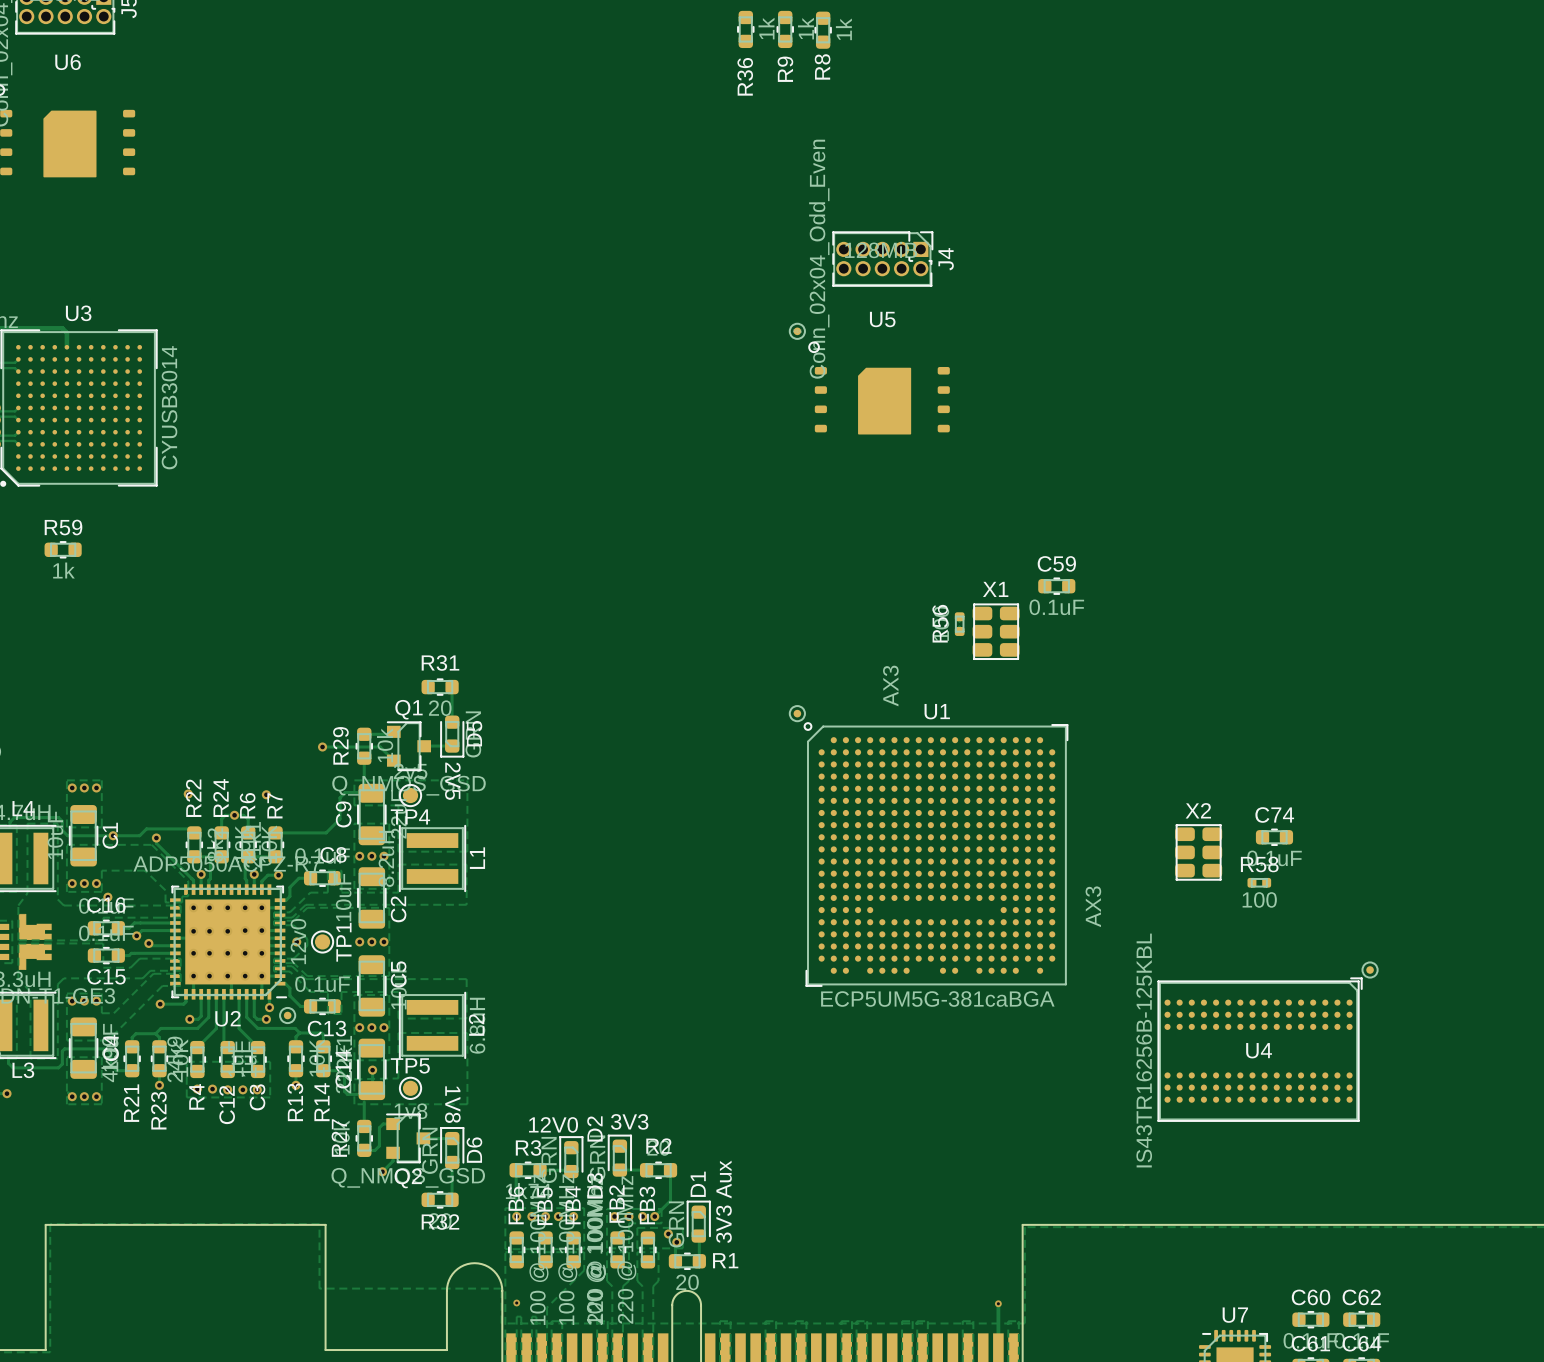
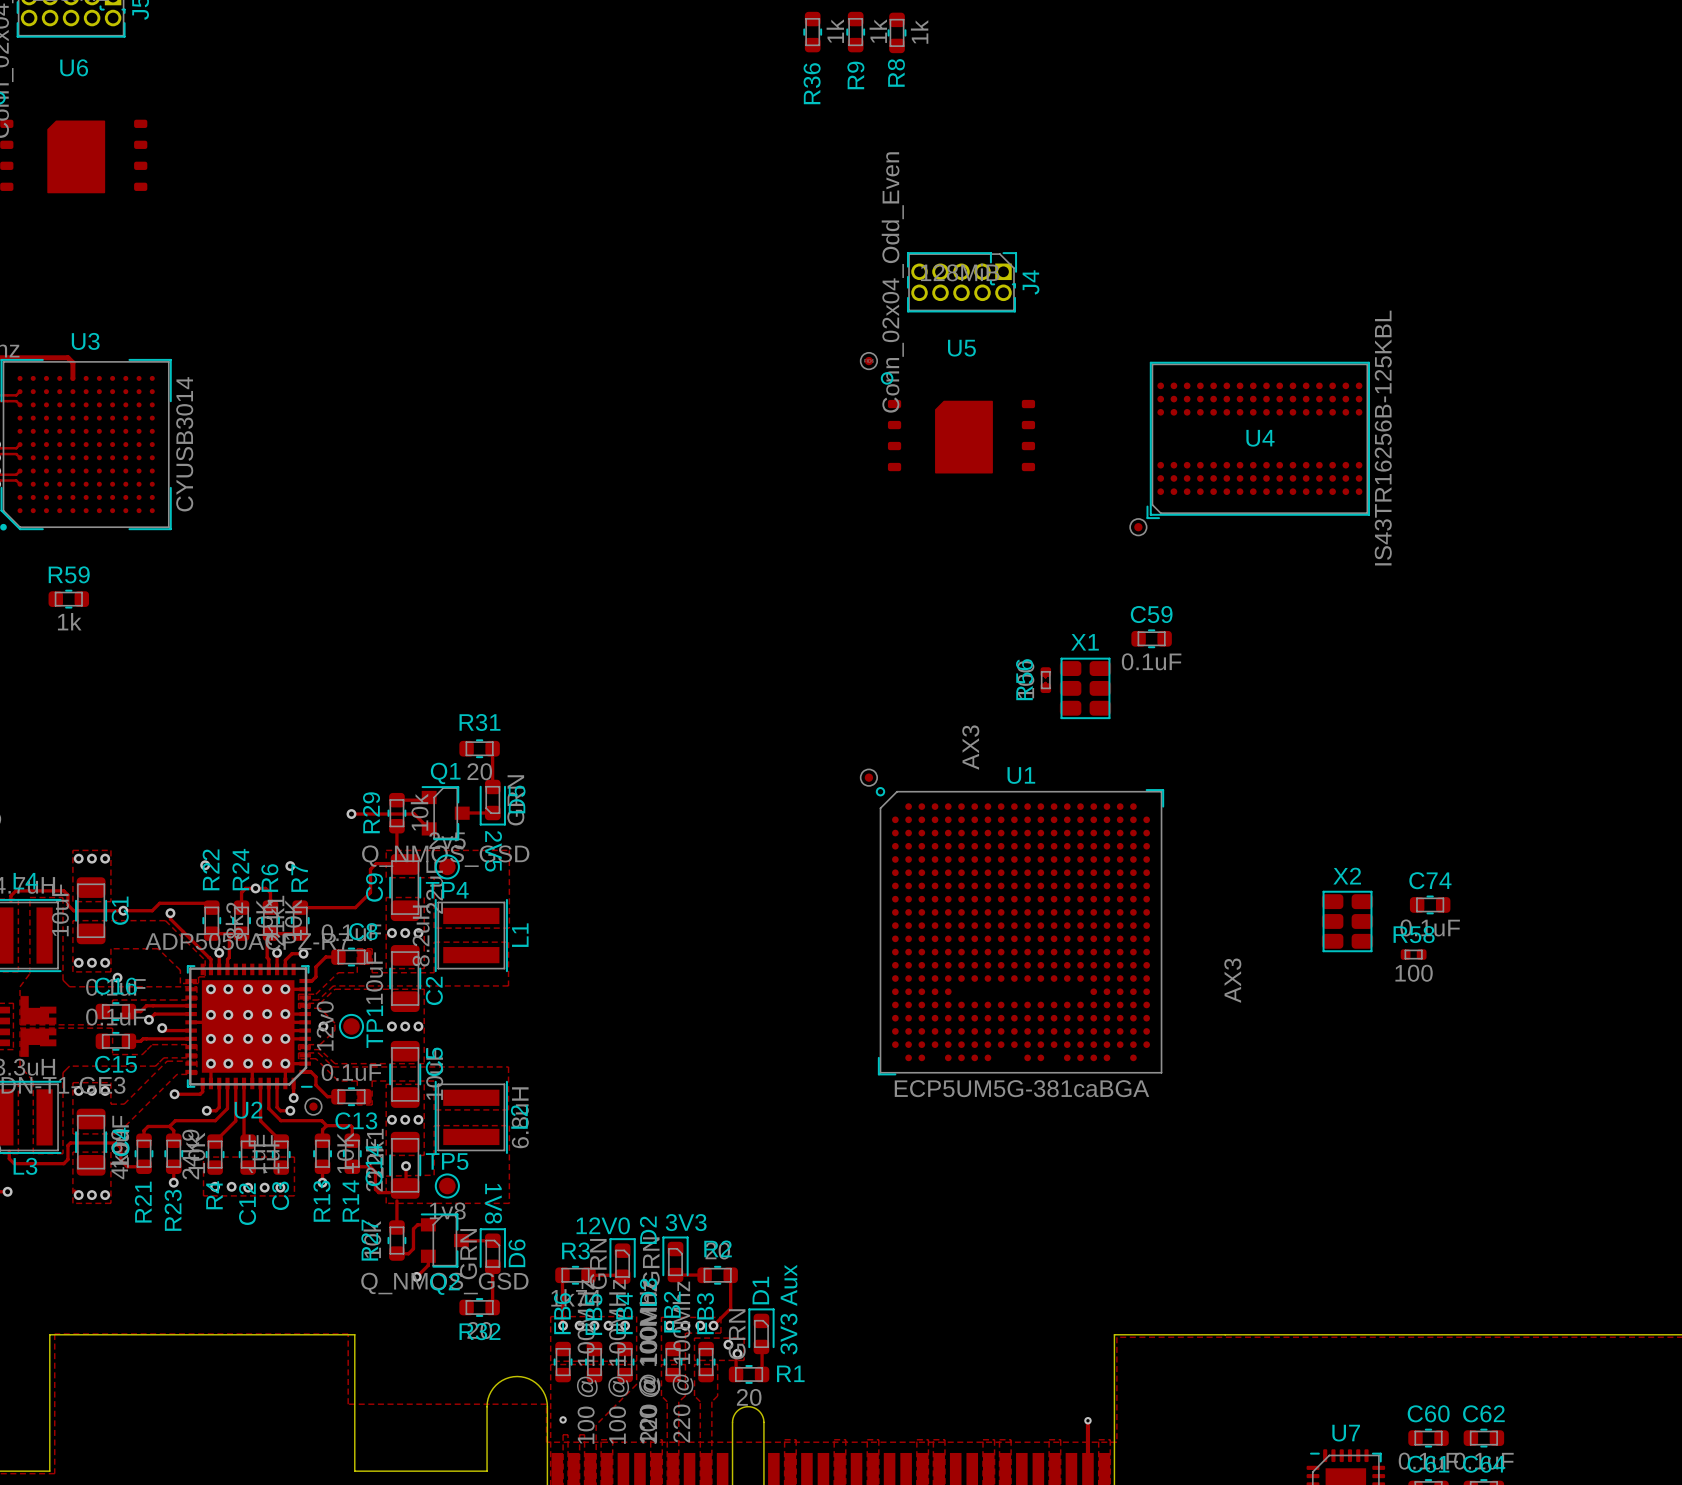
part: none -> (1138, 527)
C74 position: (1274, 837) -> (1430, 904)
X2 position: (1198, 852) -> (1347, 921)
R58 position: (1259, 882) -> (1413, 954)
part: (1370, 970) -> none
U4 rotation: 0° (1260, 1049) -> 180° (1258, 440)
U4 position: (1260, 1049) -> (1258, 440)

